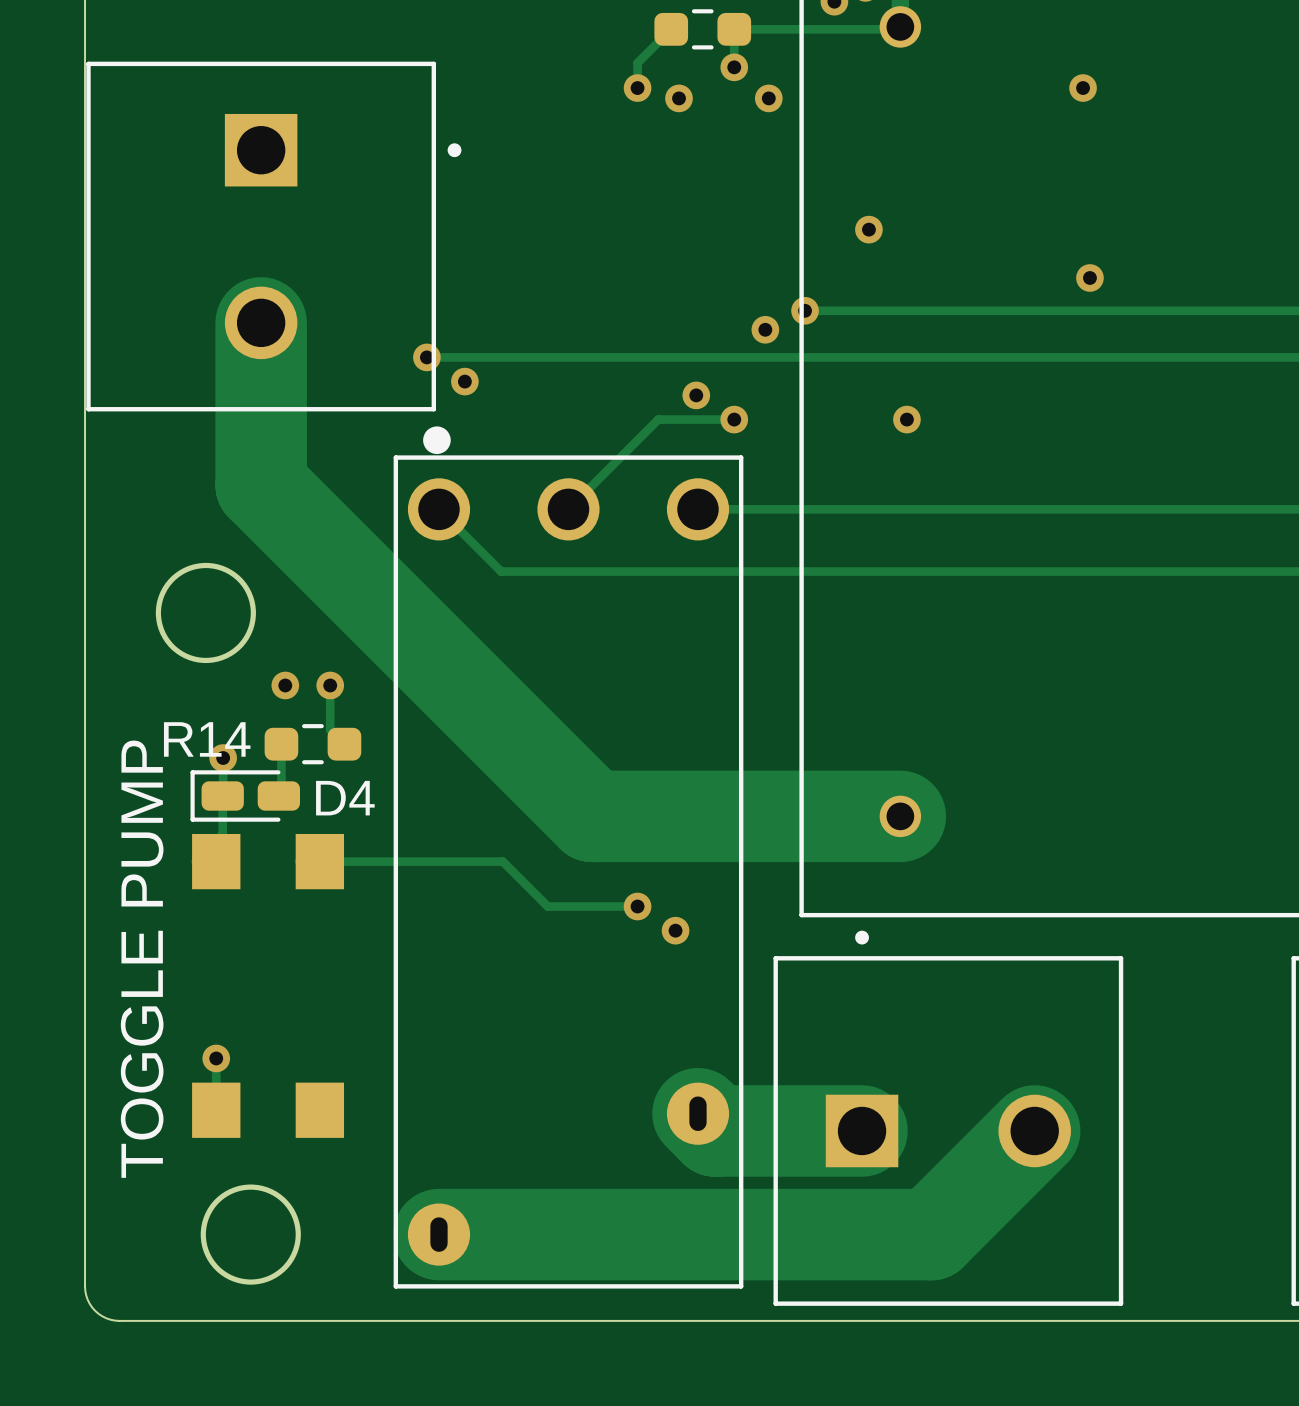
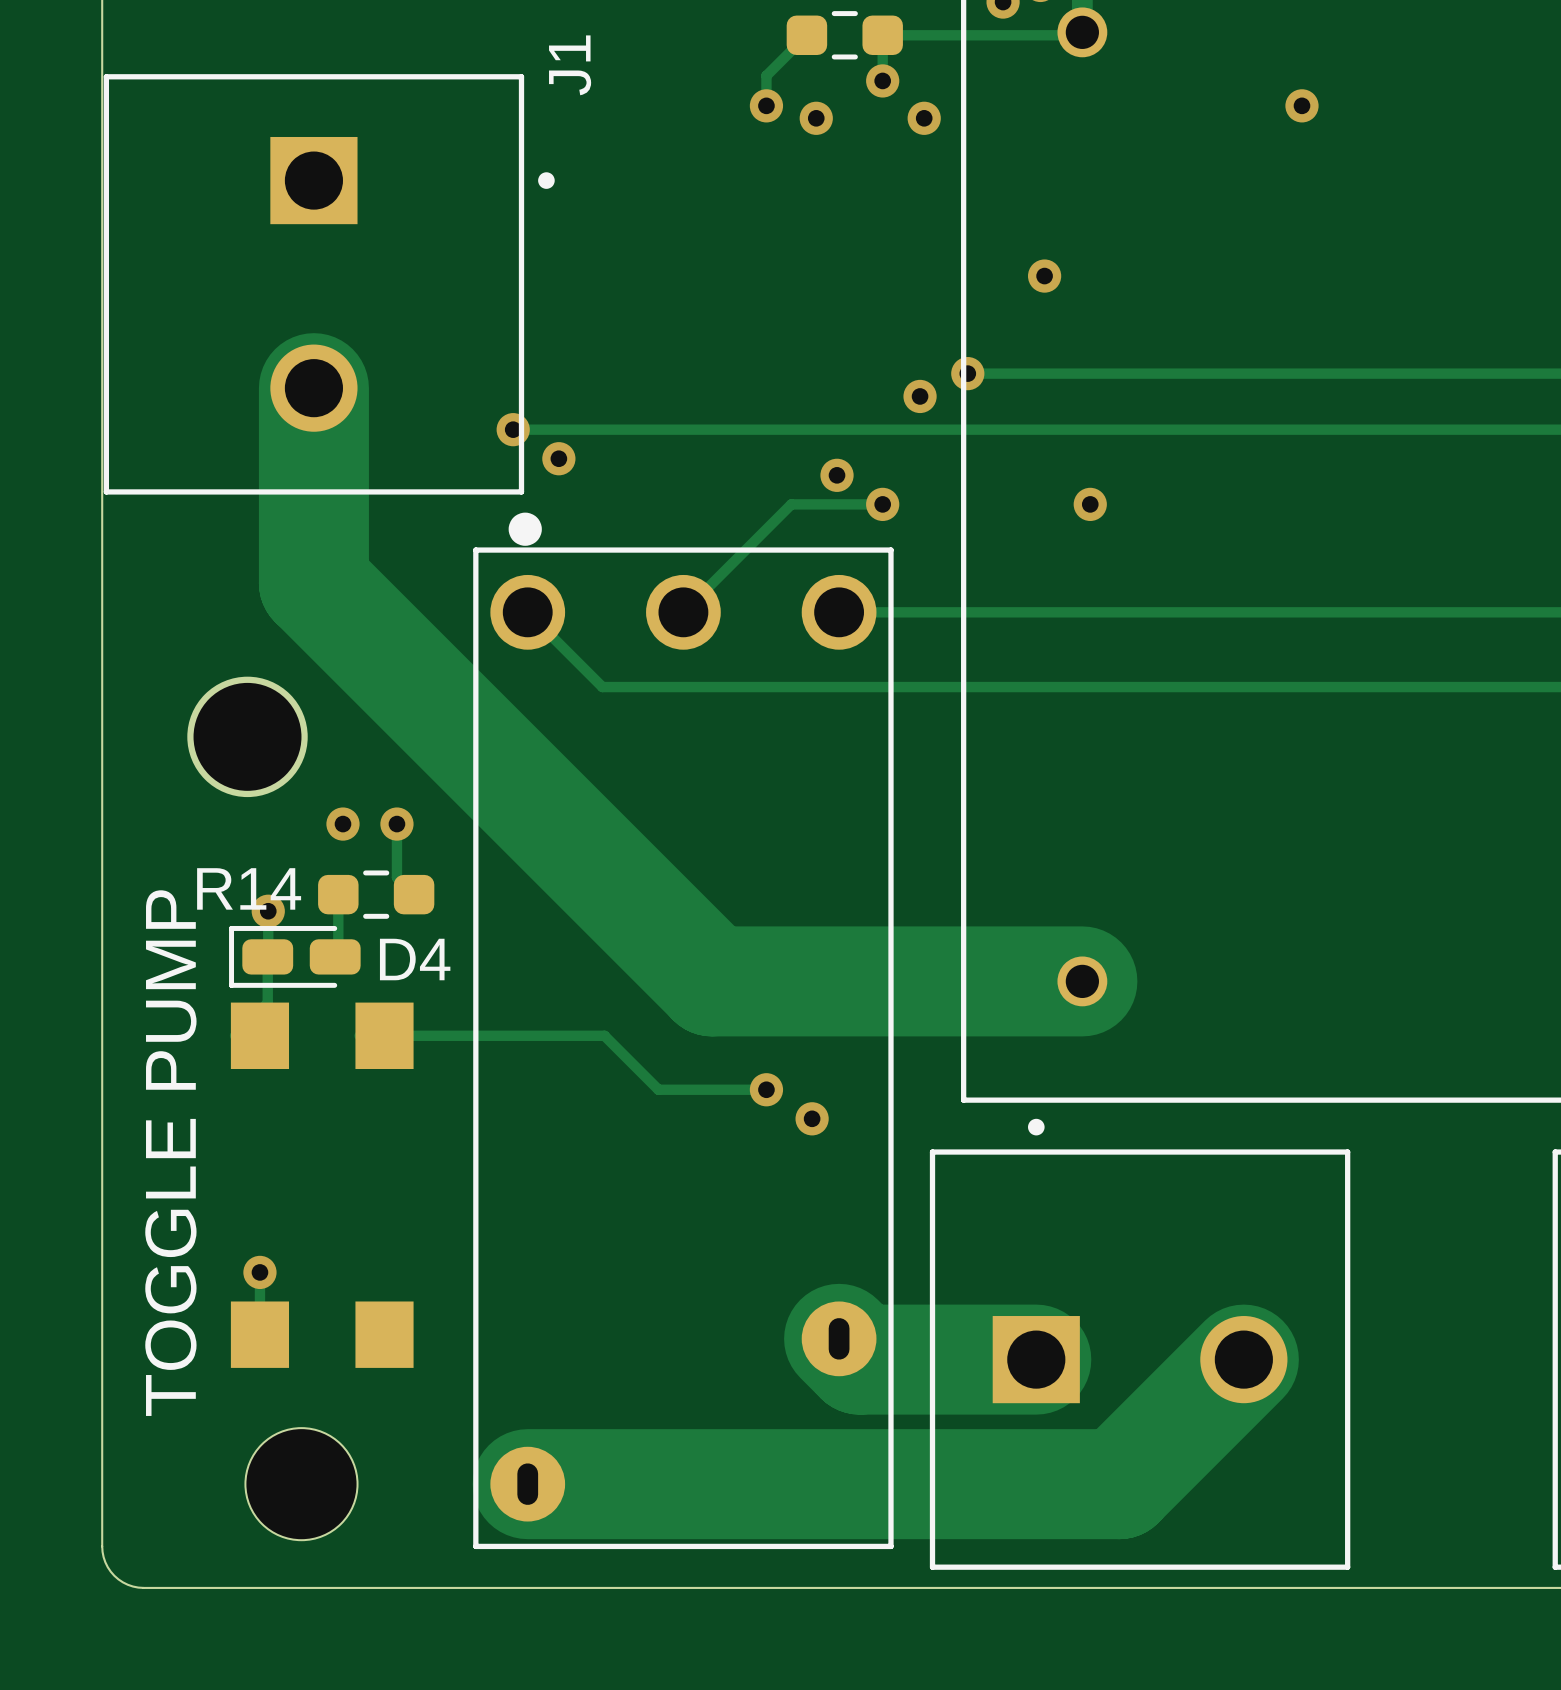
J1 name: none -> J1 (570, 65)
via: (1089, 277) -> none
part: none -> (247, 736)
round board edge: [200, 1184, 301, 1285] -> none
part: none -> (301, 1484)

